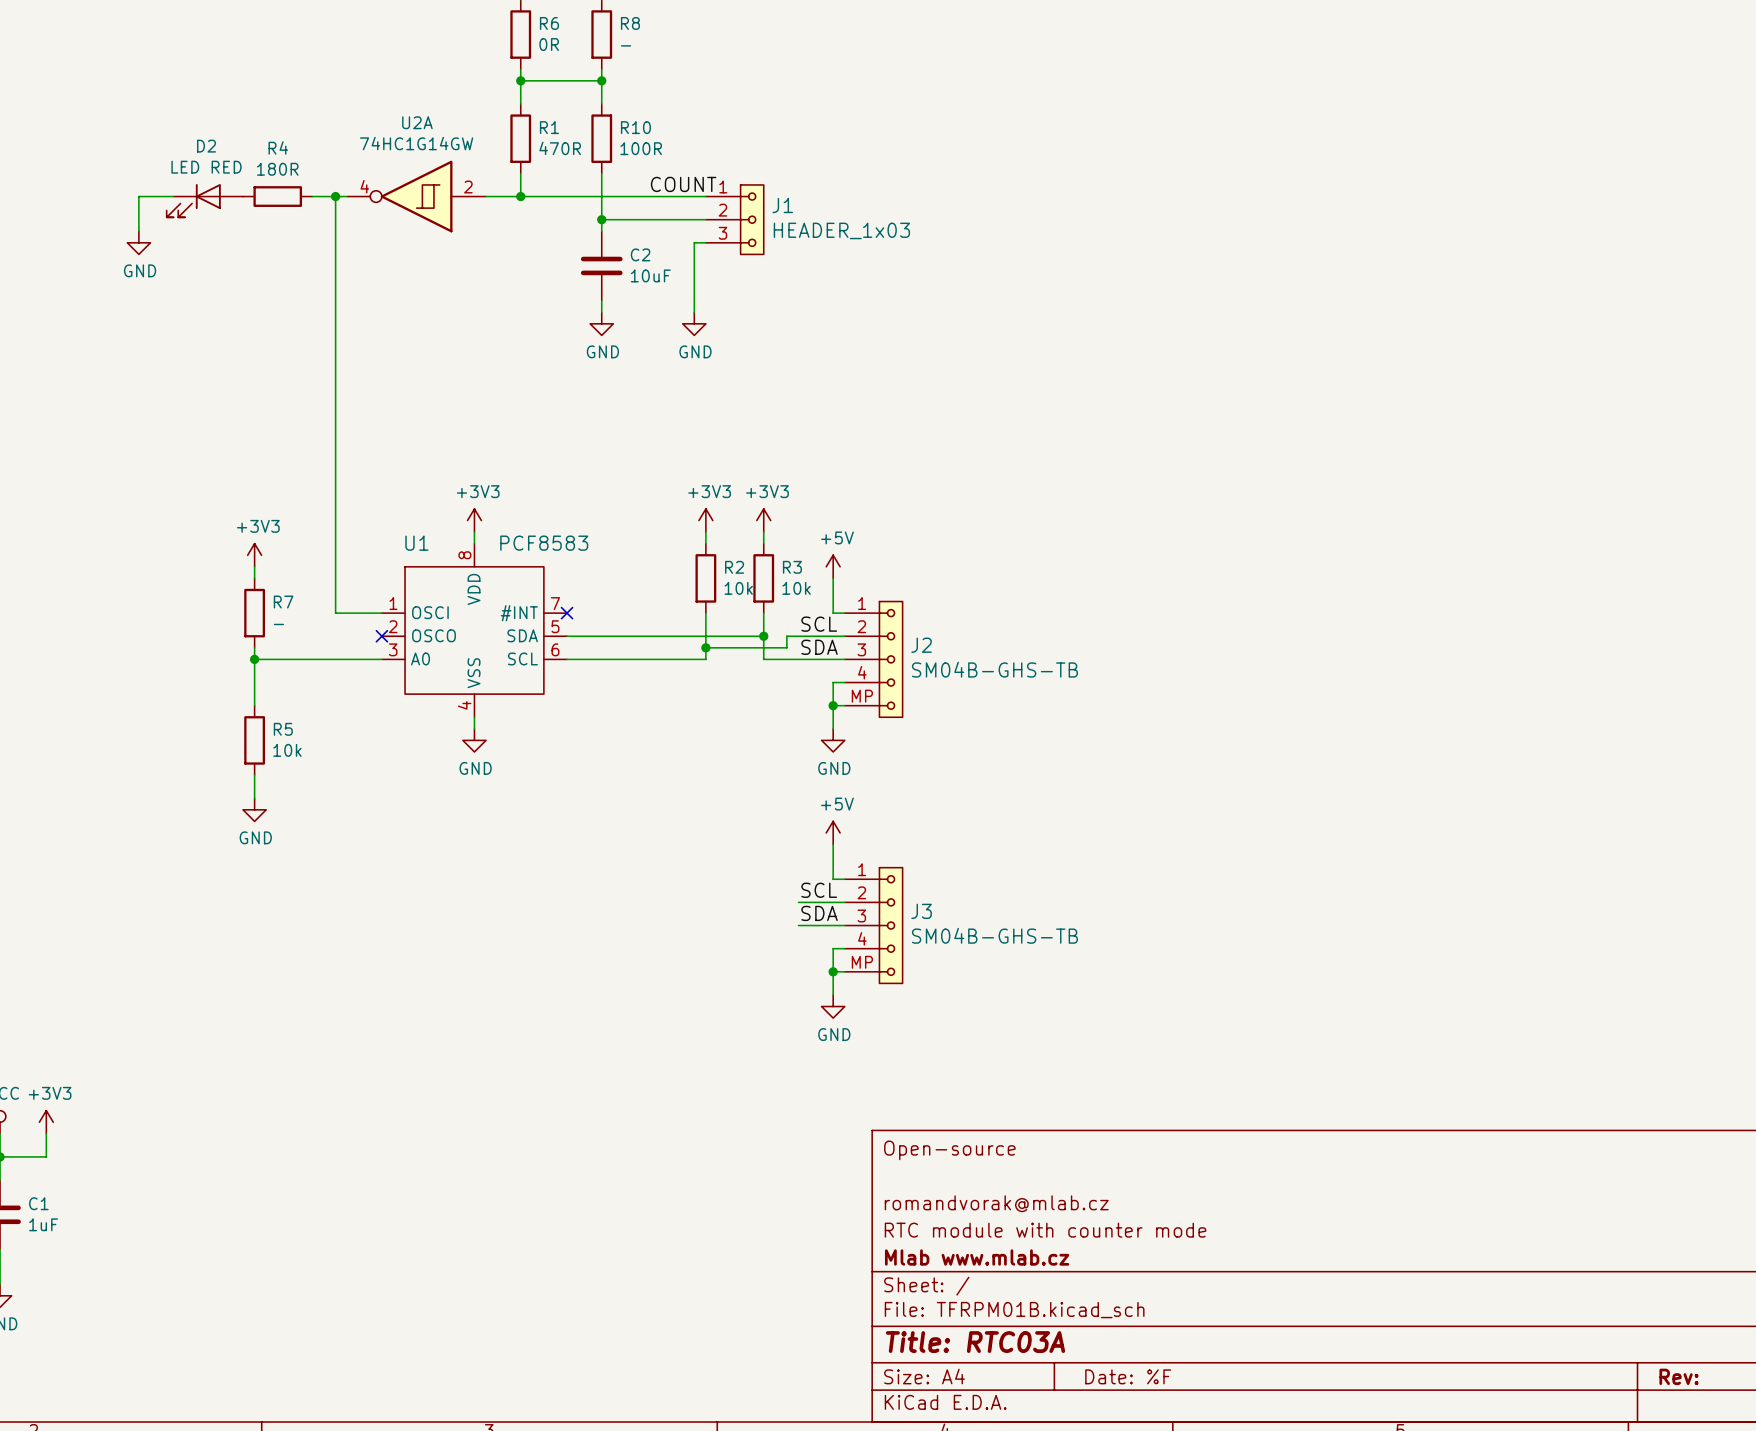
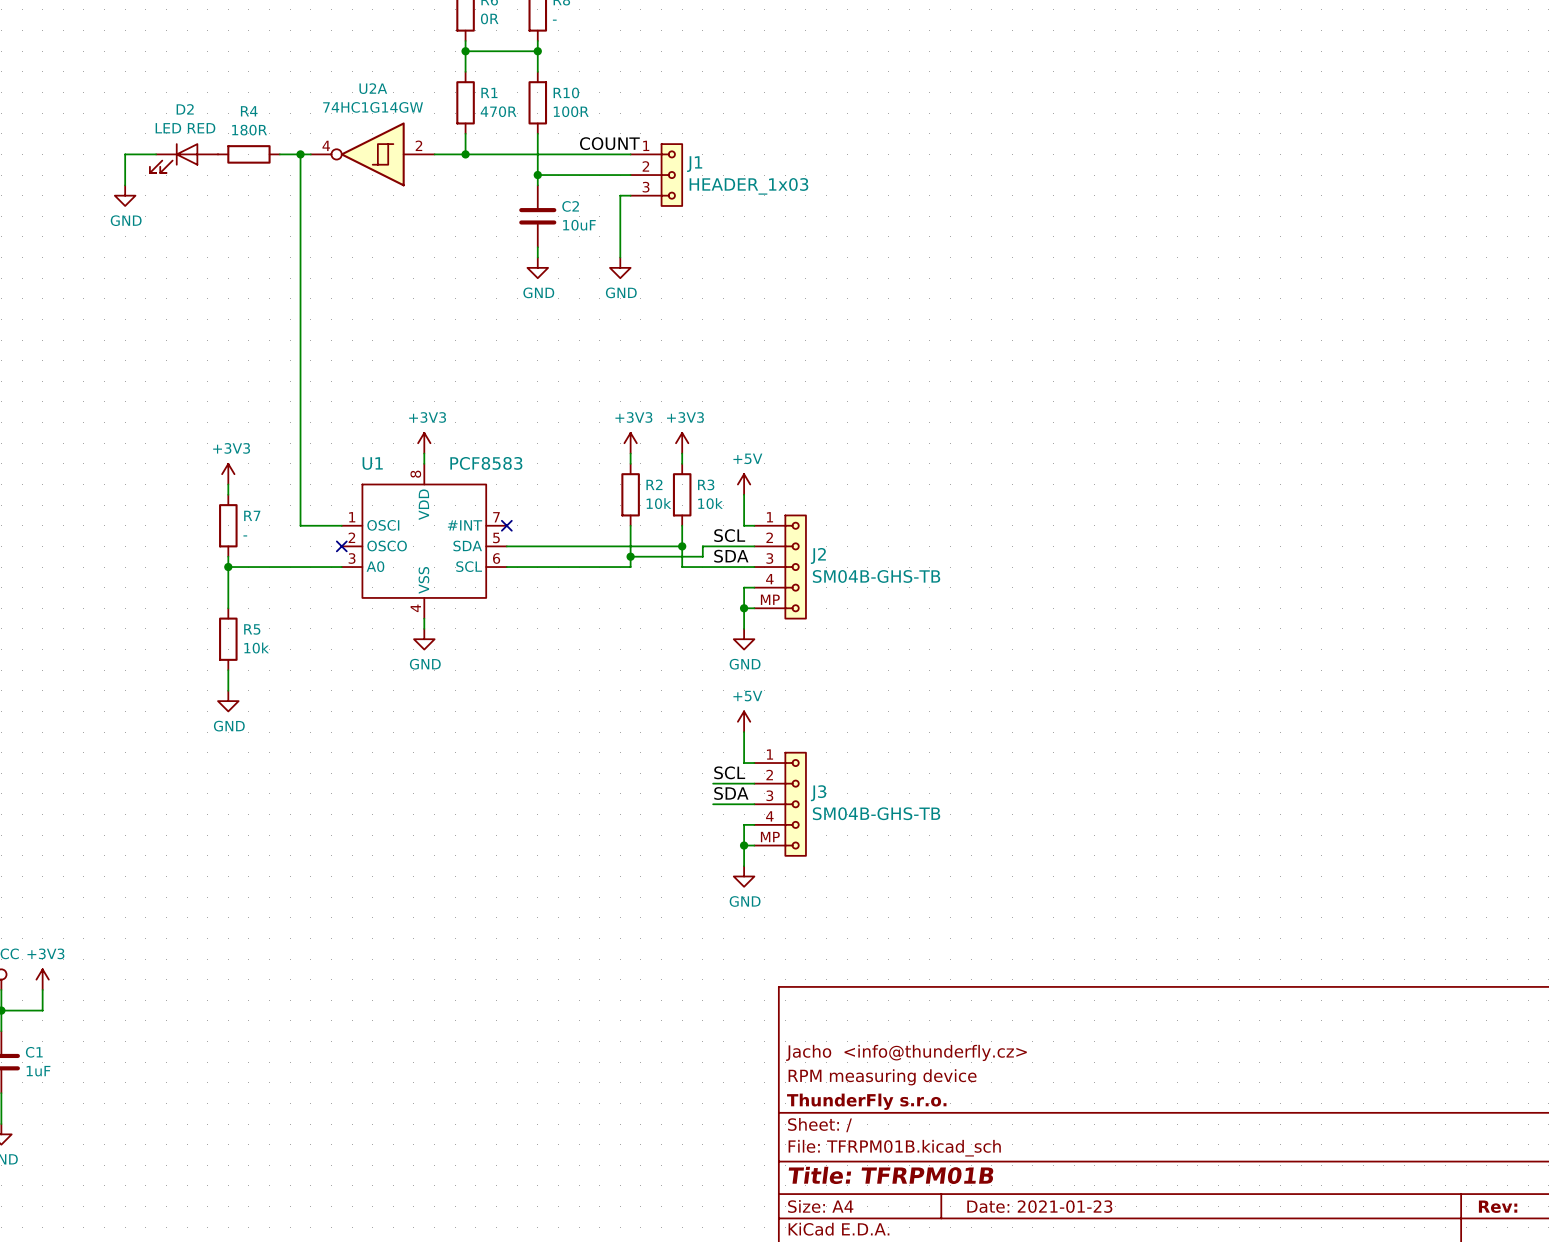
title block: Open-source (949, 1150) -> none
title block: romandvorak@mlab.cz (996, 1203) -> Jacho <info@thunderfly.cz> (906, 1052)
title block: RTC module with counter mode (1045, 1230) -> RPM measuring device (882, 1077)
title block: Mlab www.mlab.cz (977, 1257) -> ThunderFly s.r.o. (866, 1101)
title block: Title: RTC03A (975, 1342) -> Title: TFRPM01B (891, 1175)
title block: Date: %F (1128, 1376) -> Date: 2021-01-23 (1039, 1206)

